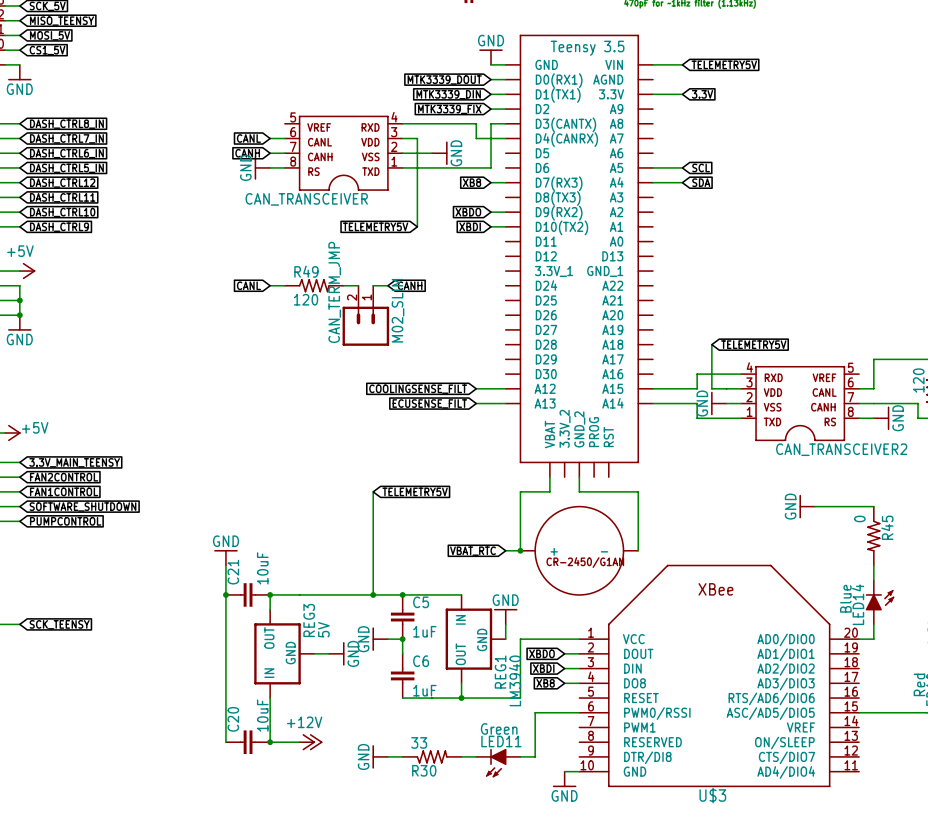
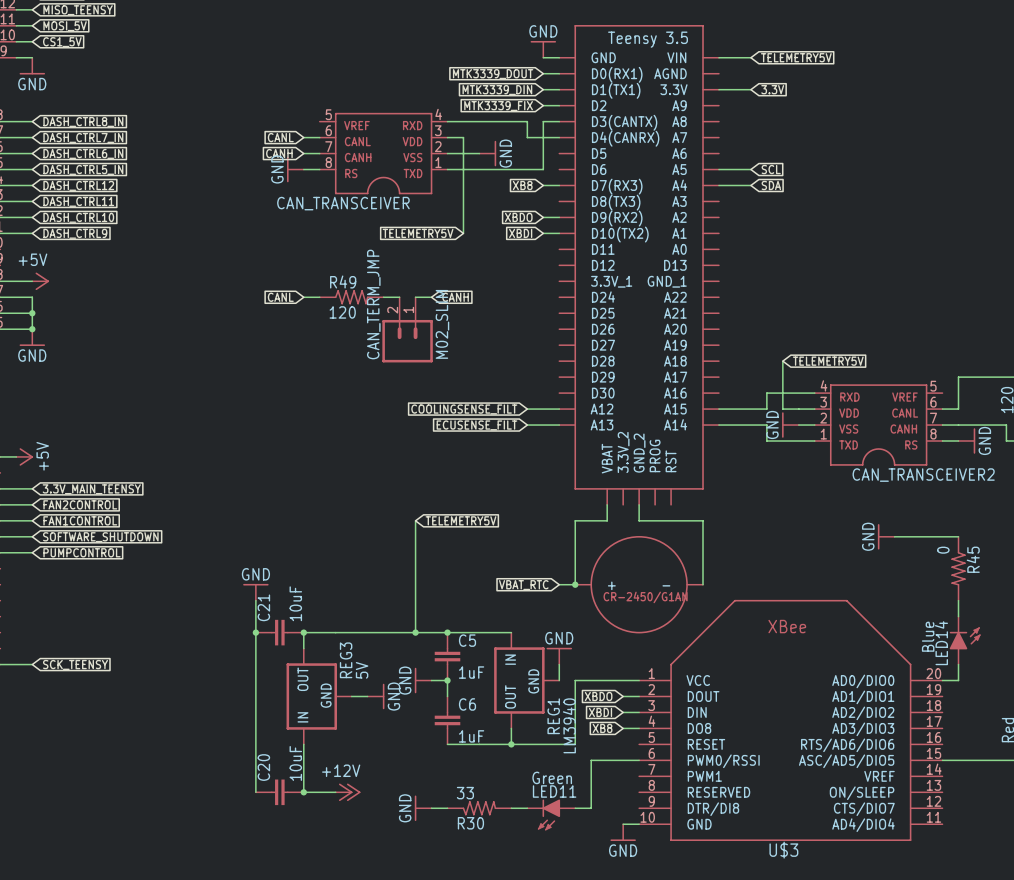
power symbol text rotation: 0° (35, 427) -> 90° counterclockwise (42, 456)

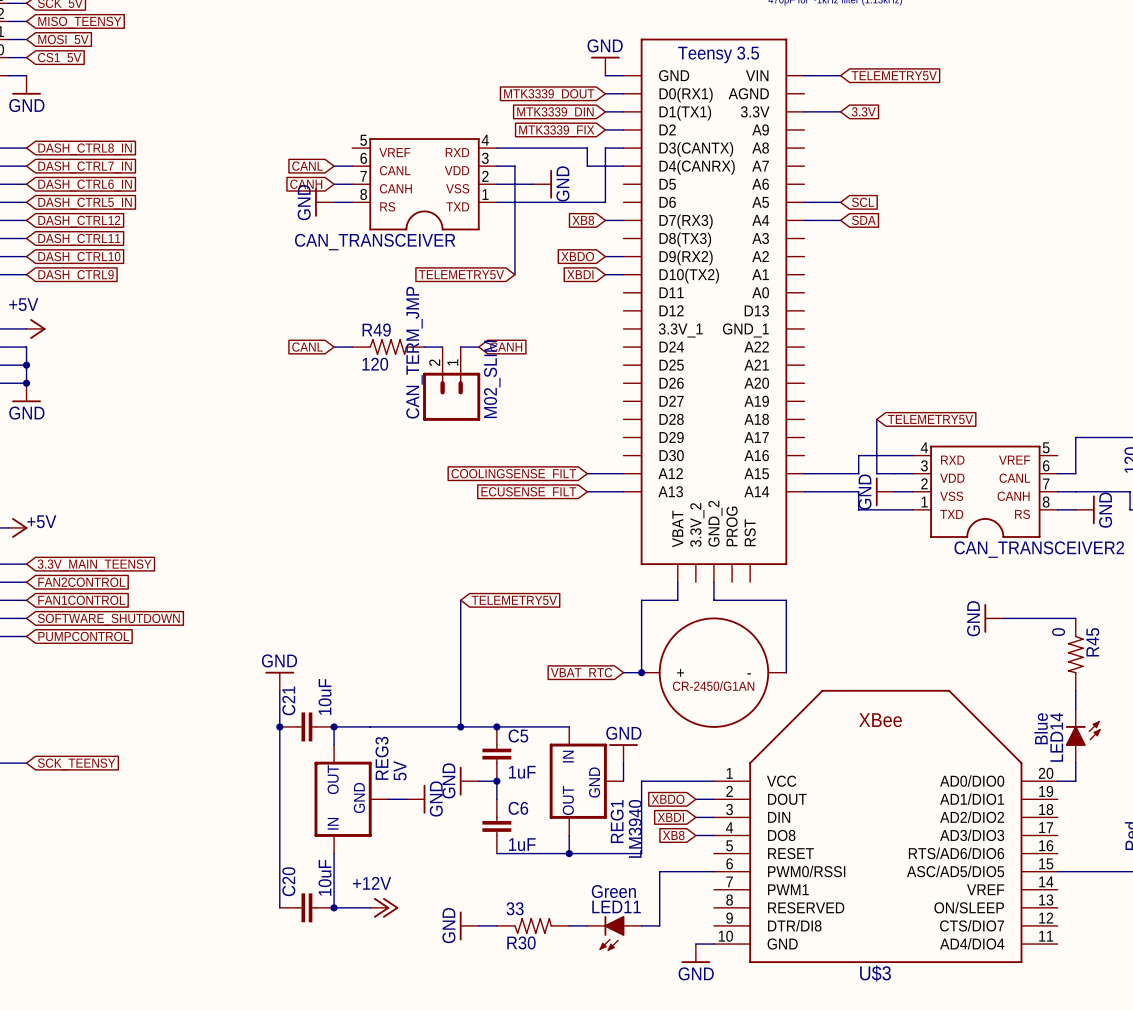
power symbol text rotation: 0° (42, 456) -> 90° clockwise (41, 521)

